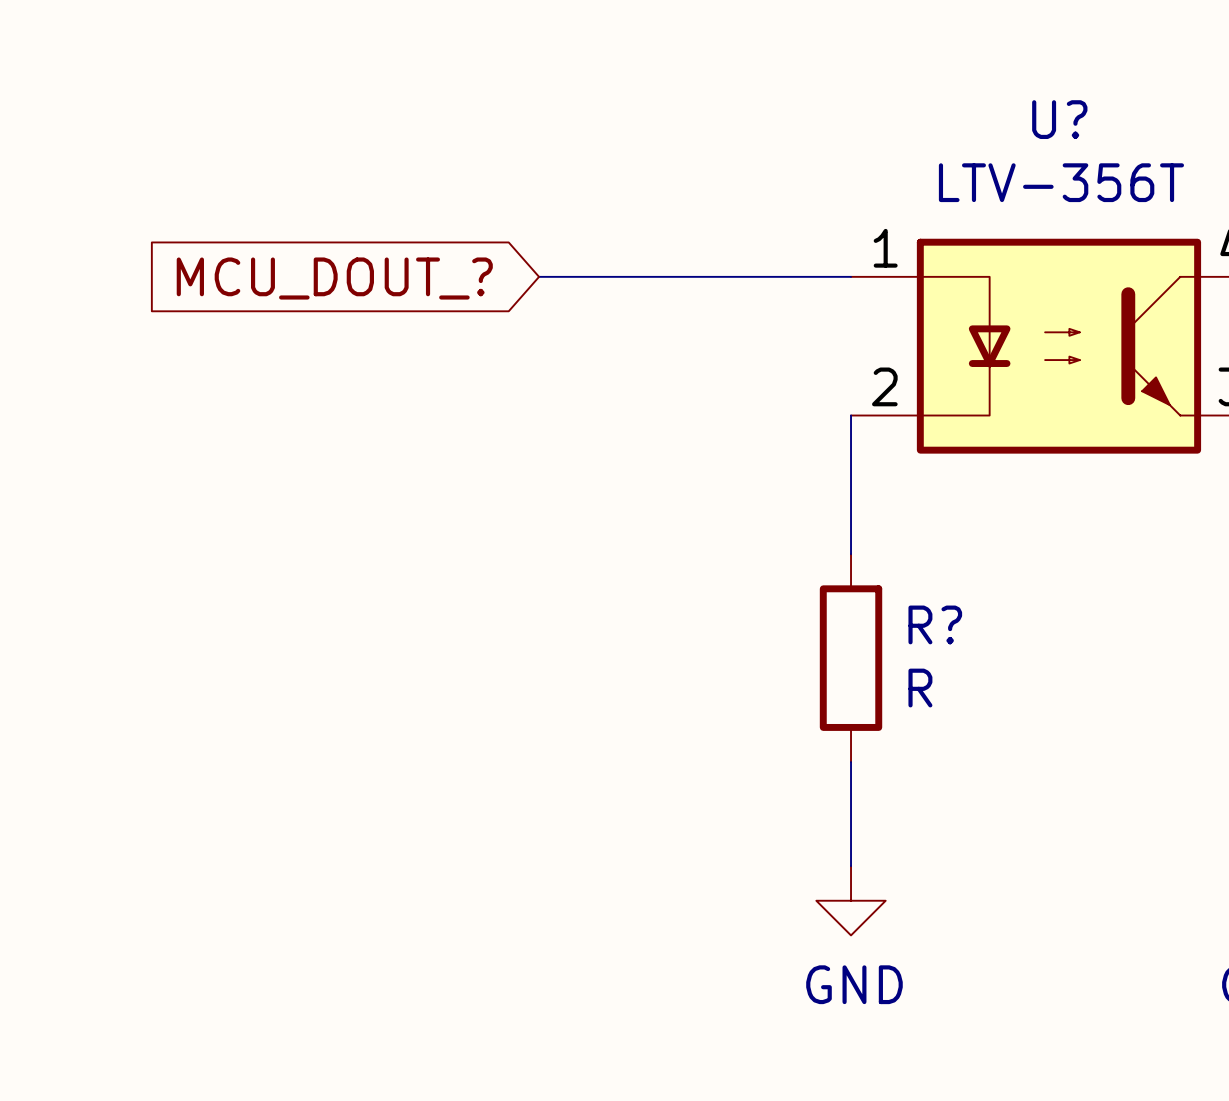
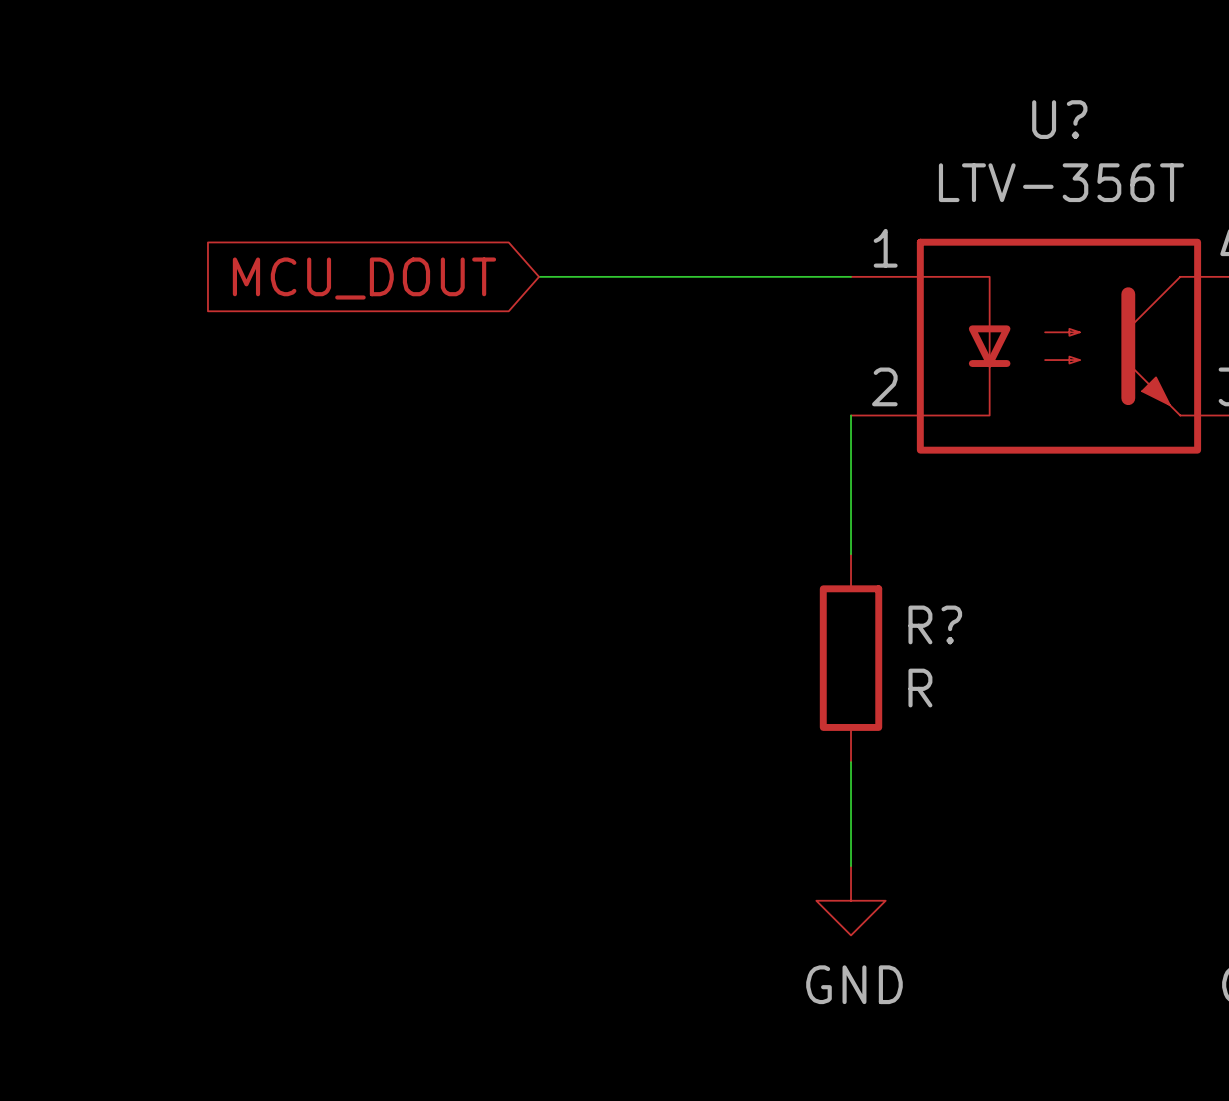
global label: MCU_DOUT_? (334, 278) -> MCU_DOUT (364, 278)

